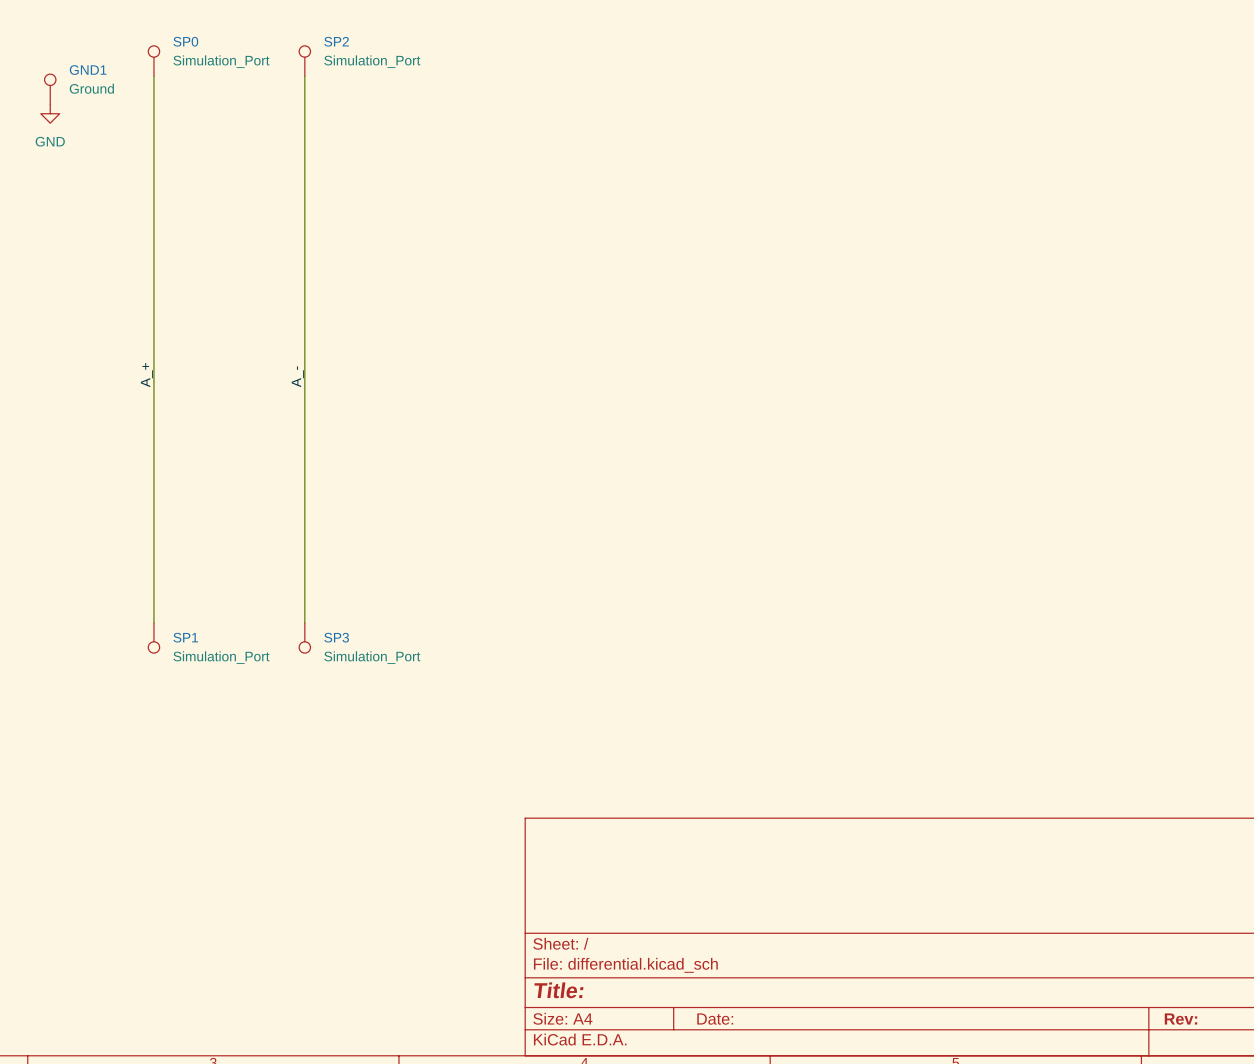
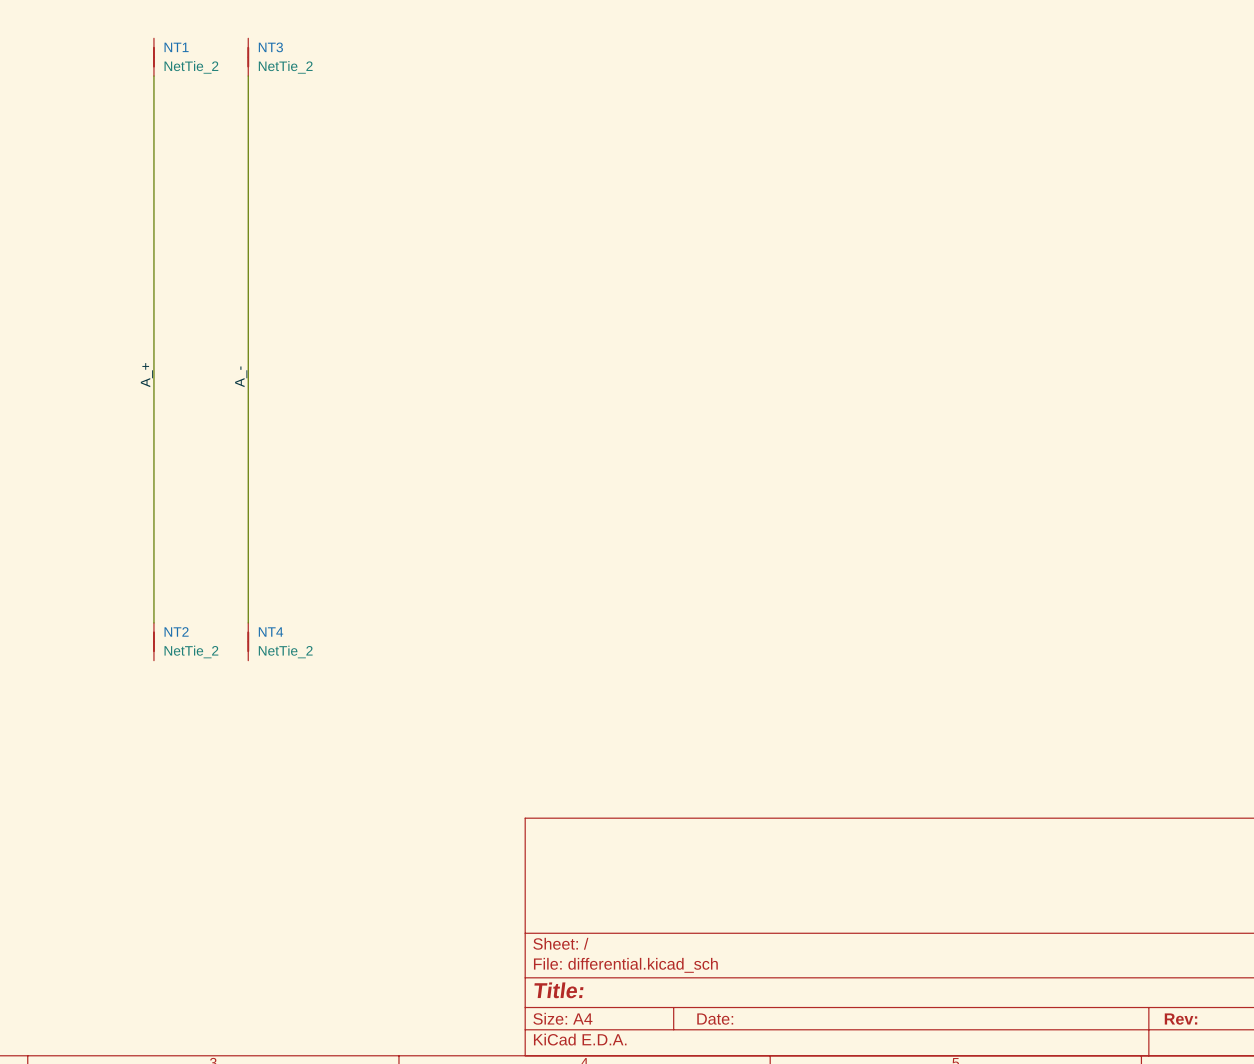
NT1: none -> NetTie_2 (153, 57)
NT3: none -> NetTie_2 (248, 57)
SP0: Simulation_Port (153, 60) -> none
SP2: Simulation_Port (304, 60) -> none
wire: (304, 76) (304, 622) -> (248, 76) (248, 622)
GND1: Ground (50, 89) -> none
power symbol: GND (50, 113) -> none
label position: A_- (297, 376) -> A_- (241, 376)
SP1: Simulation_Port (153, 638) -> none
SP3: Simulation_Port (304, 638) -> none
NT2: none -> NetTie_2 (153, 641)
NT4: none -> NetTie_2 (248, 641)

